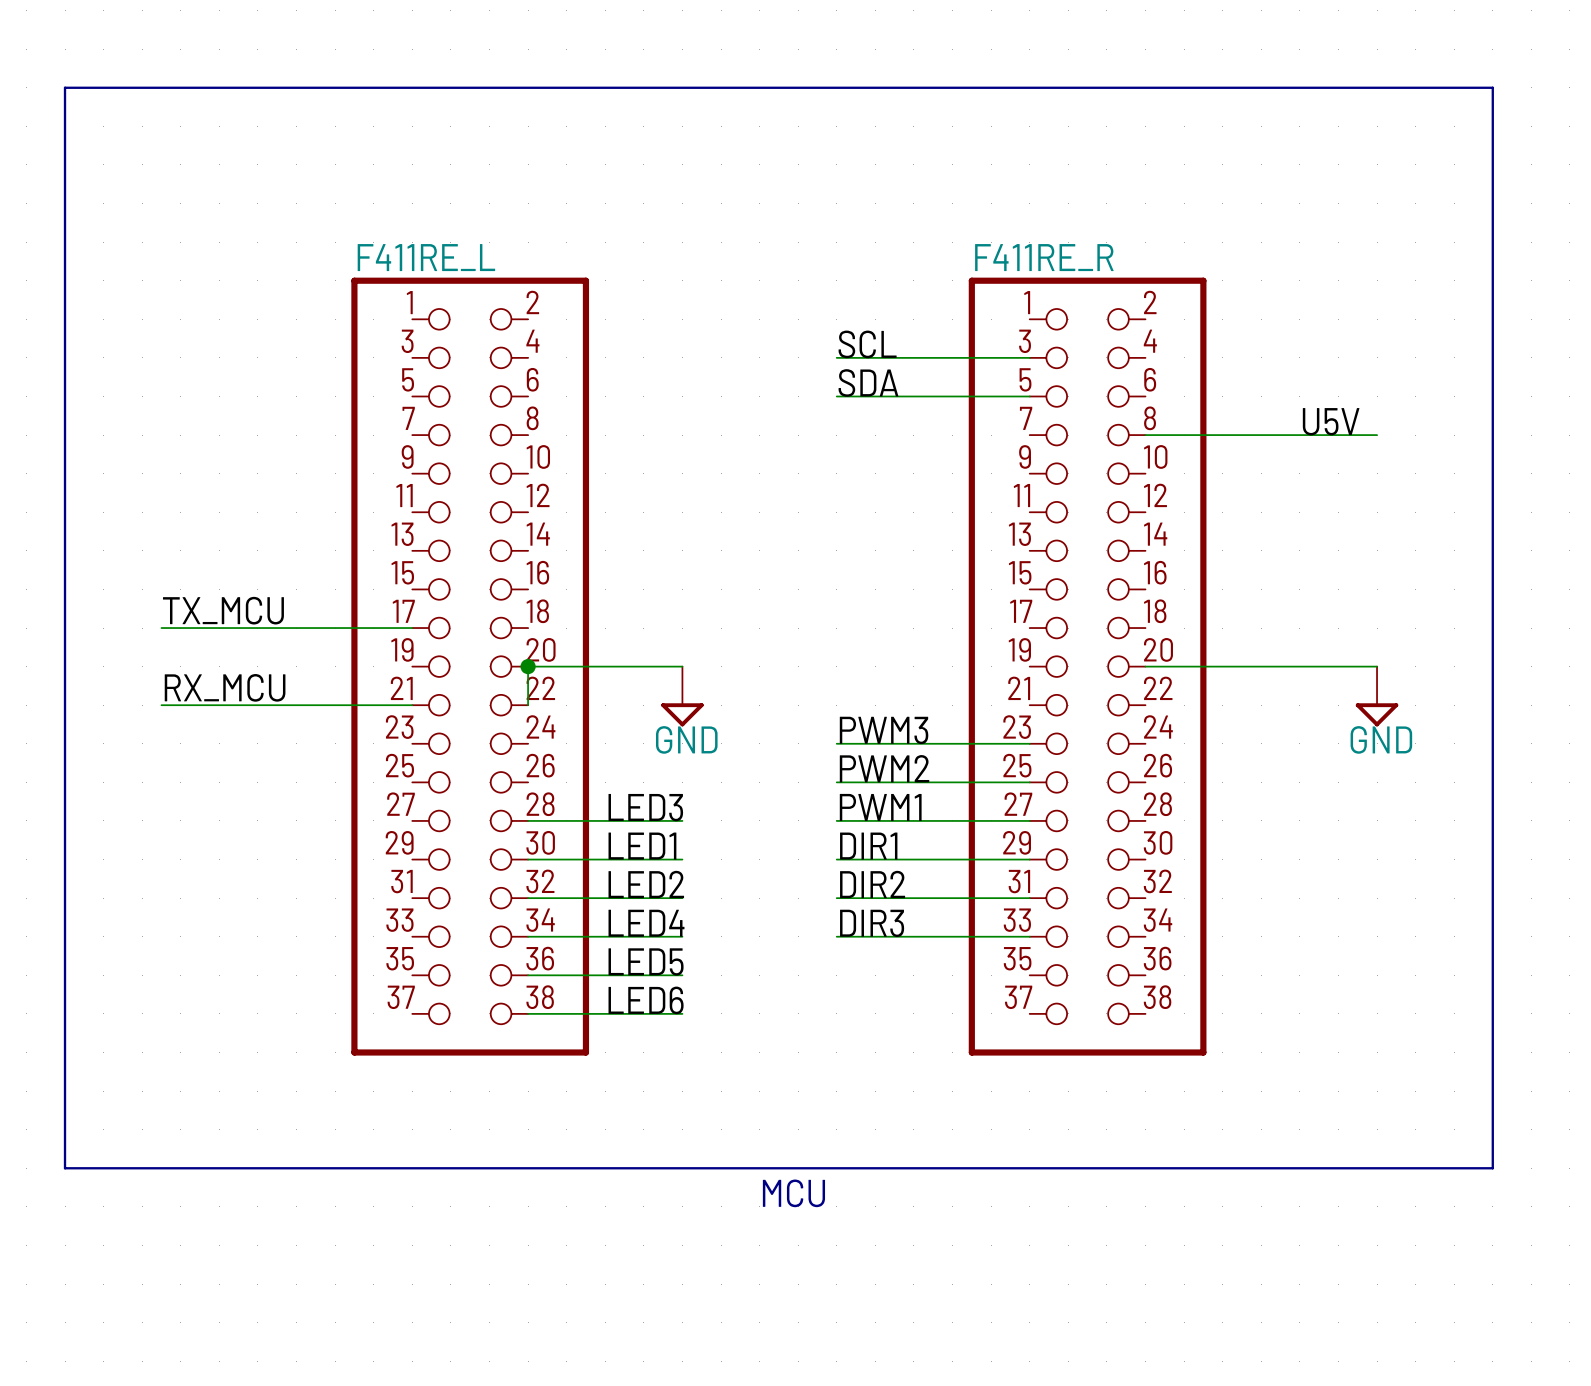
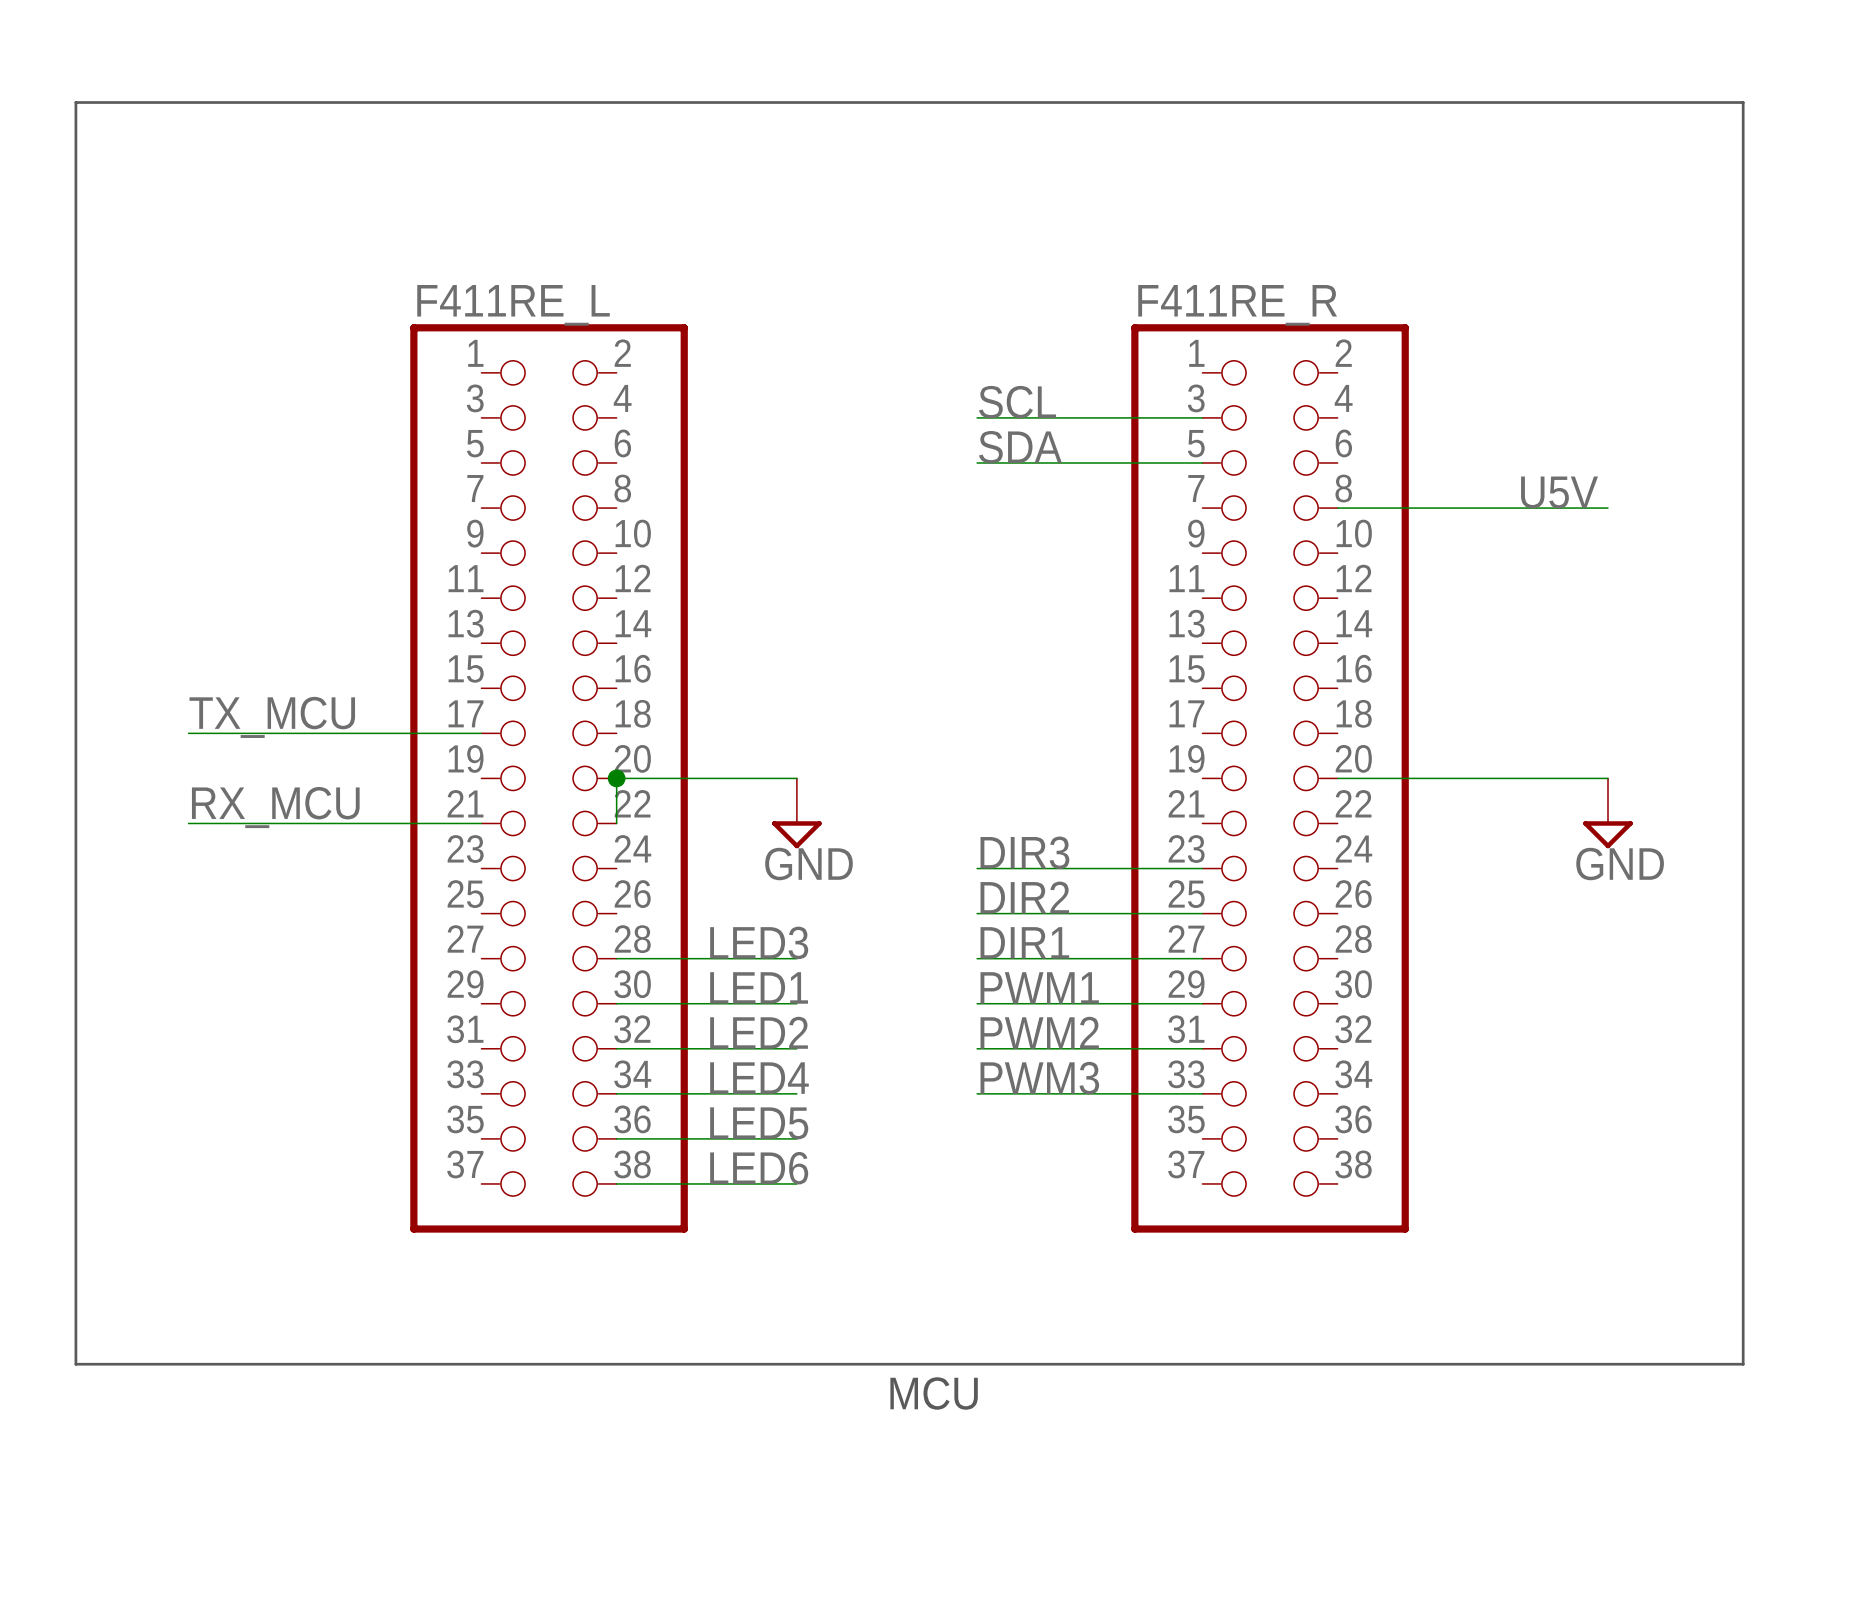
label: PWM3 (884, 730) -> DIR3 (1024, 852)
label: PWM2 (884, 768) -> DIR2 (1024, 897)
label: PWM1 (880, 807) -> DIR1 (1024, 942)
label: DIR1 (868, 846) -> PWM1 (1039, 987)
label: DIR2 (872, 884) -> PWM2 (1039, 1032)
label: DIR3 (872, 923) -> PWM3 (1039, 1078)

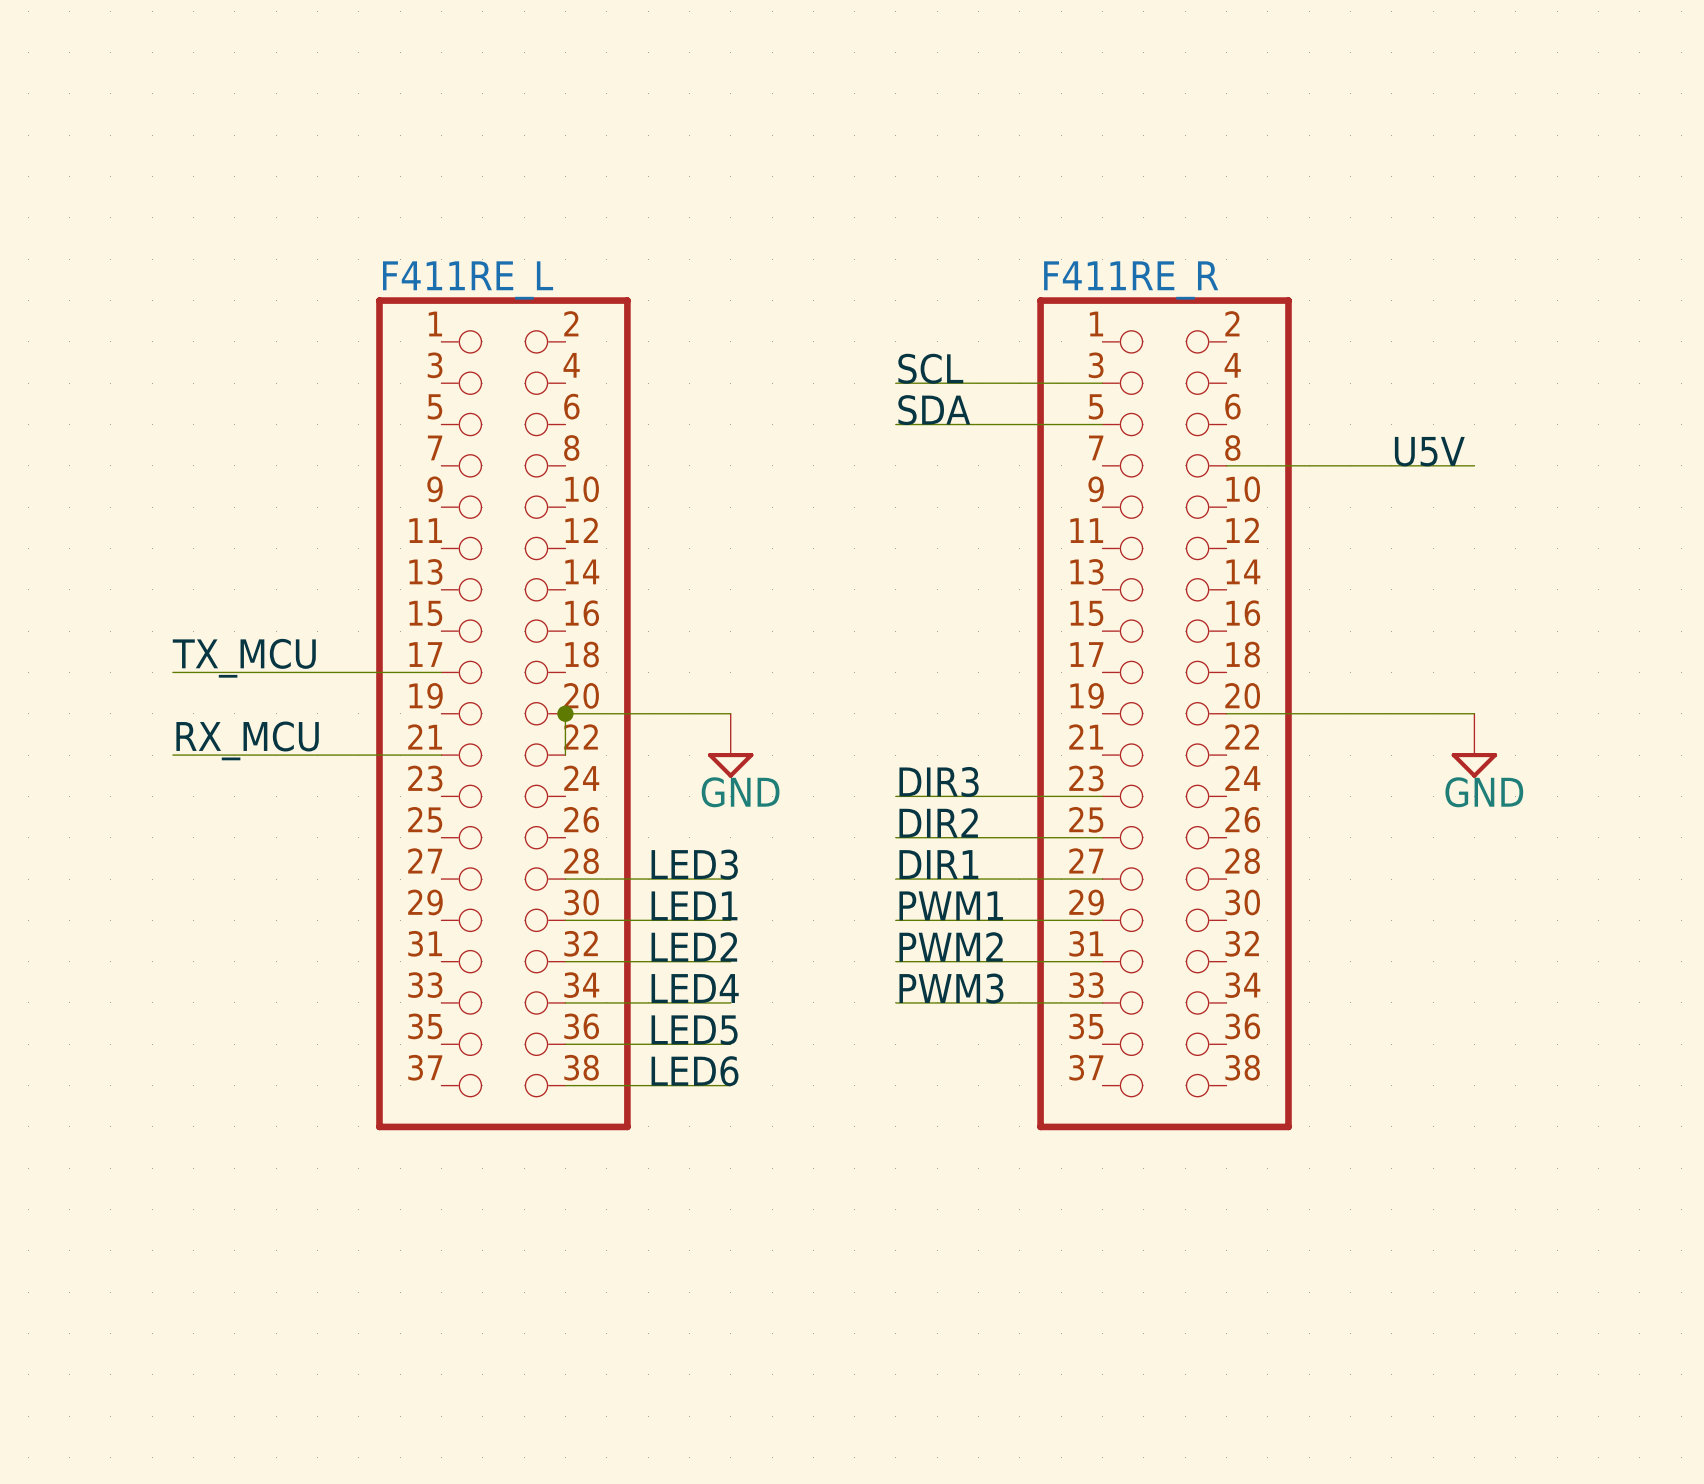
line: (75, 102) (75, 1364) (1743, 1364) (1743, 102) (75, 102) -> none
text: MCU (934, 1393) -> none

